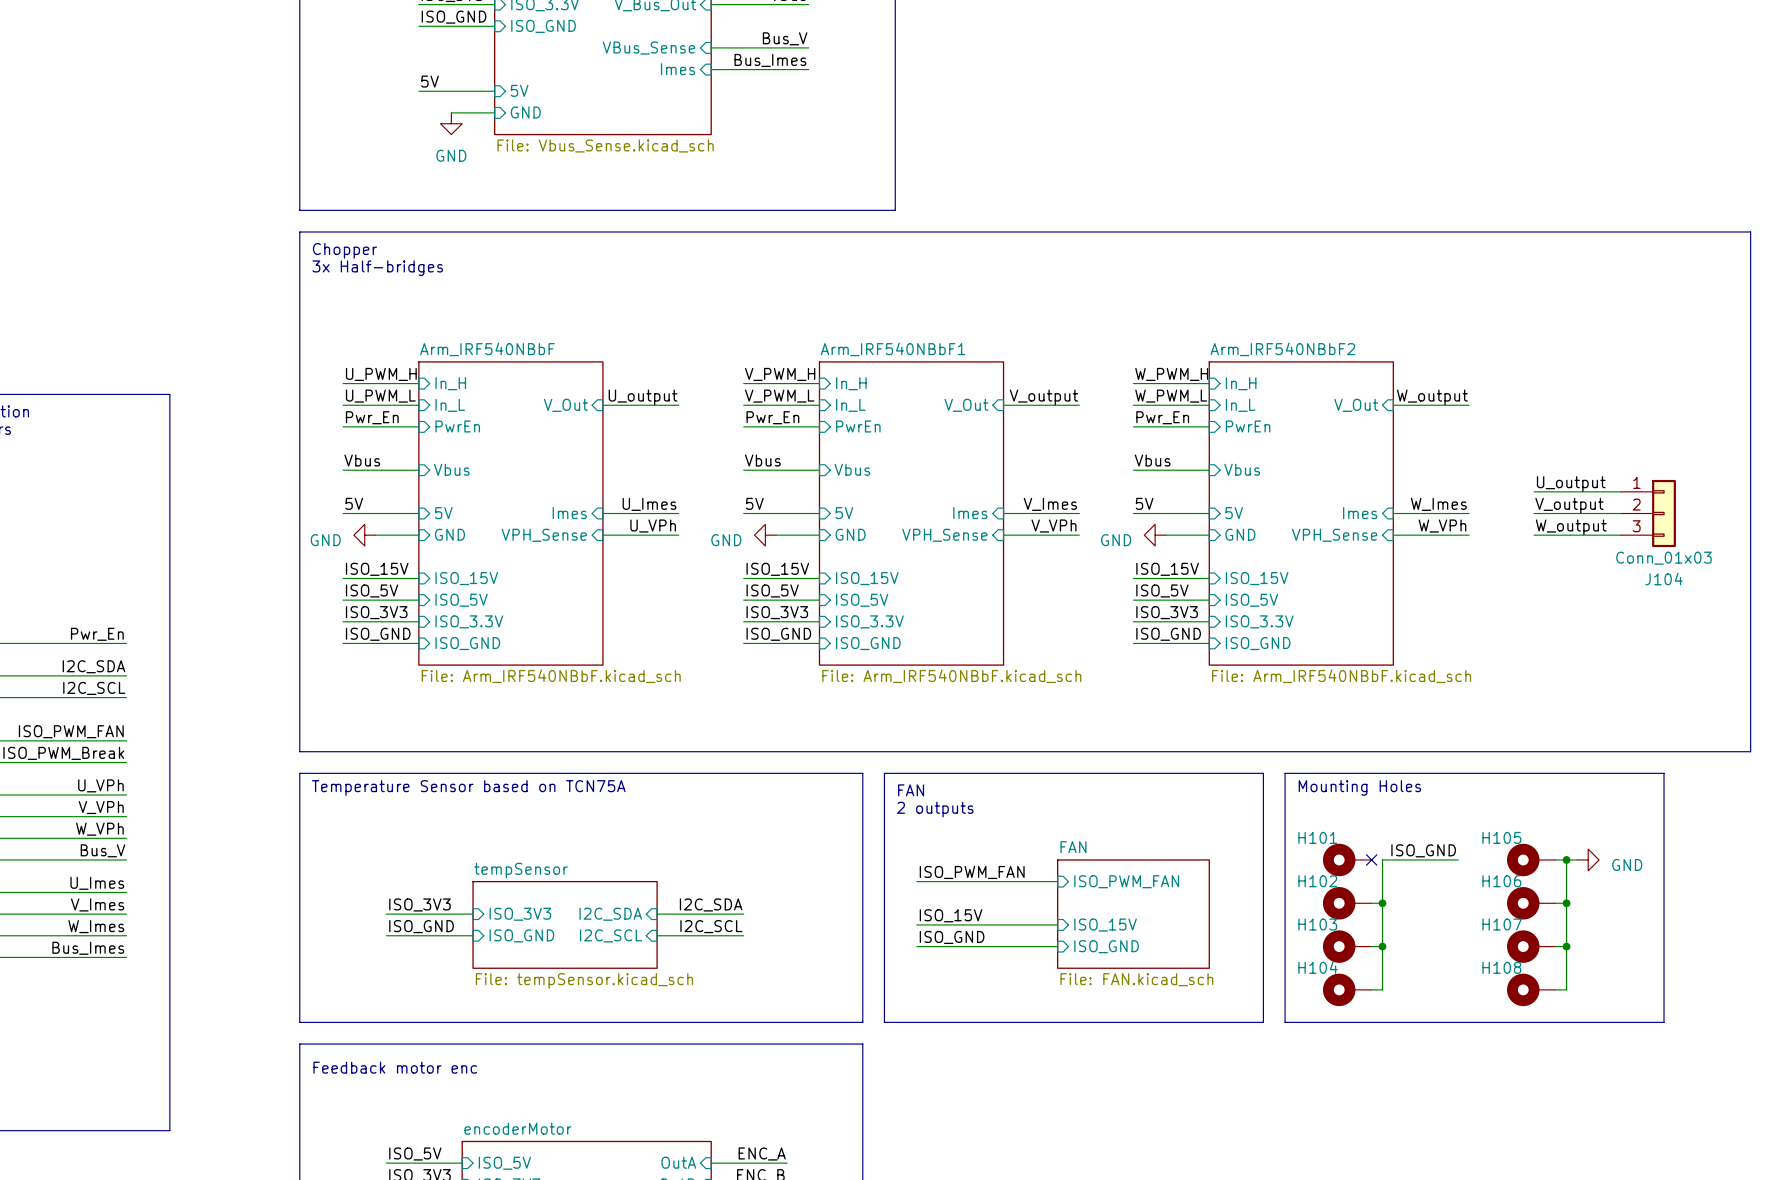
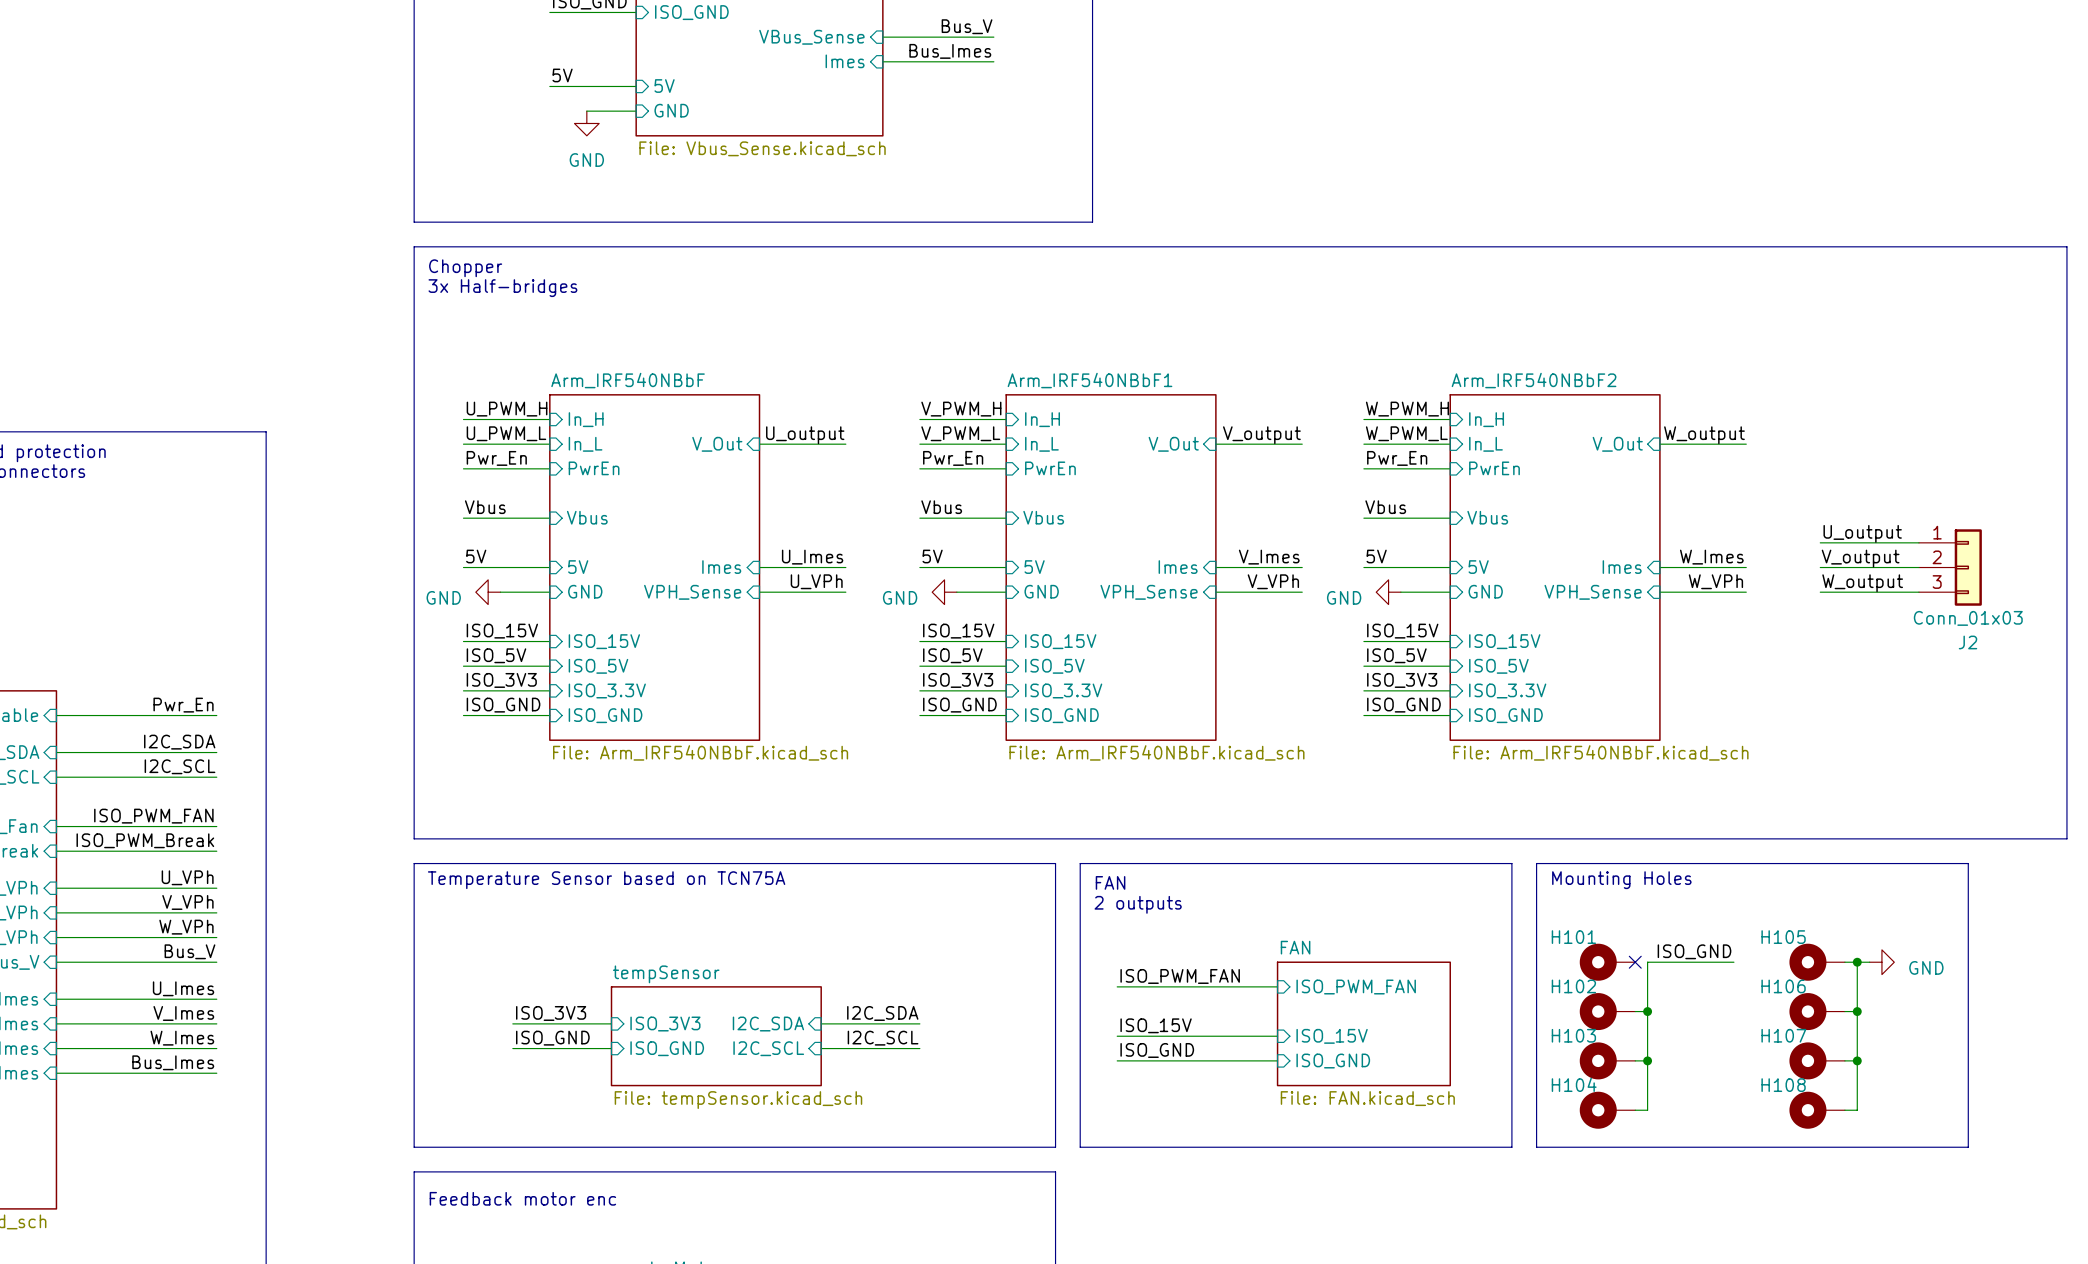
J104 name: J104 (1664, 579) -> J2 (1968, 642)

